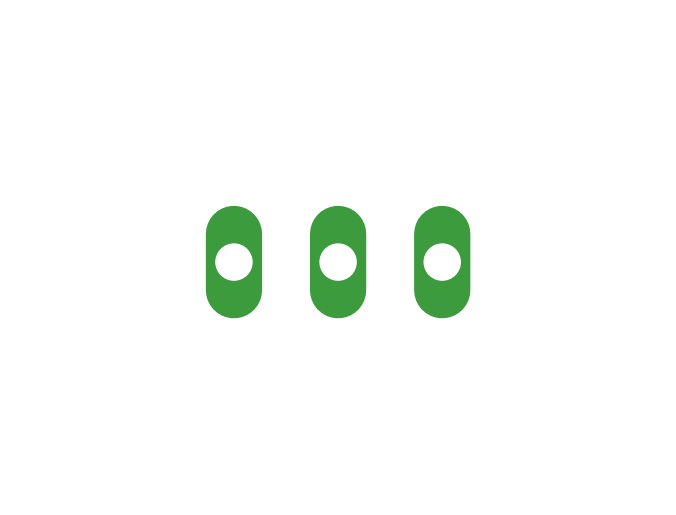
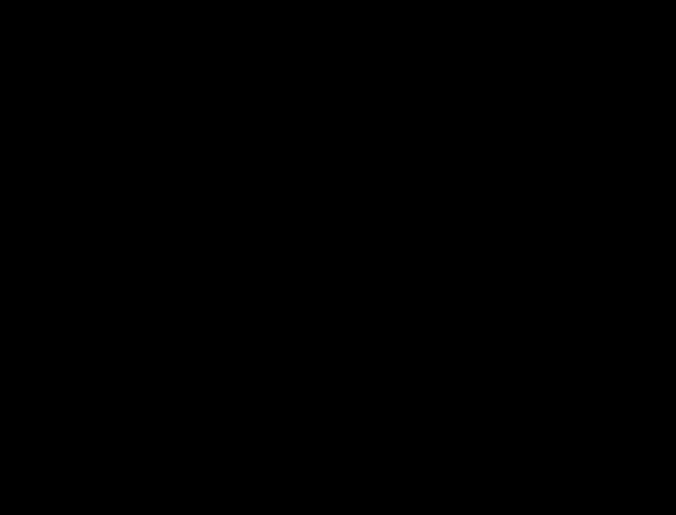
part: (338, 262) -> none

